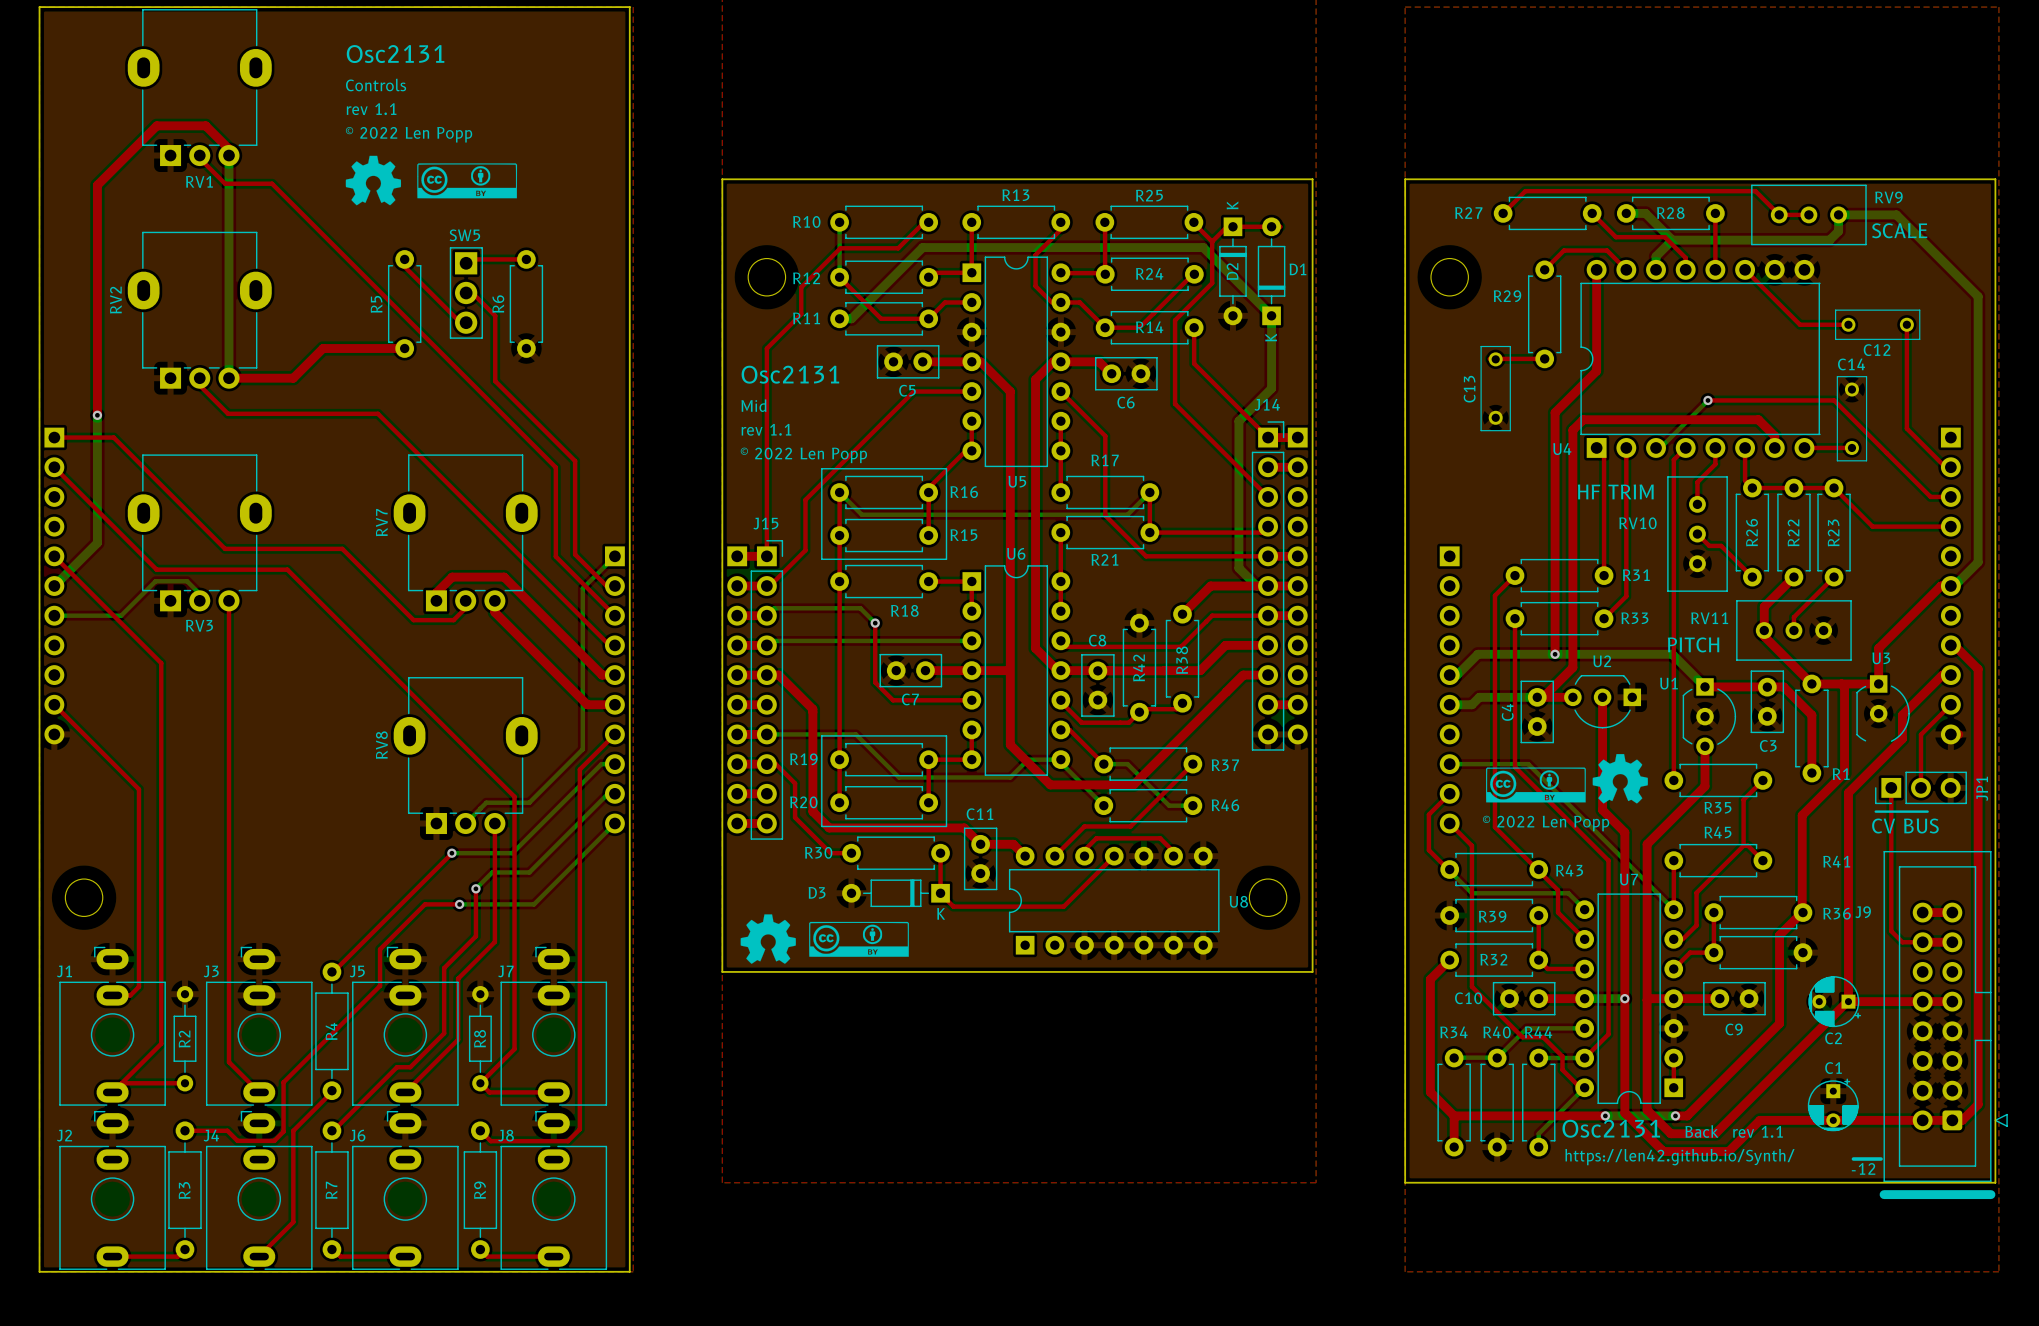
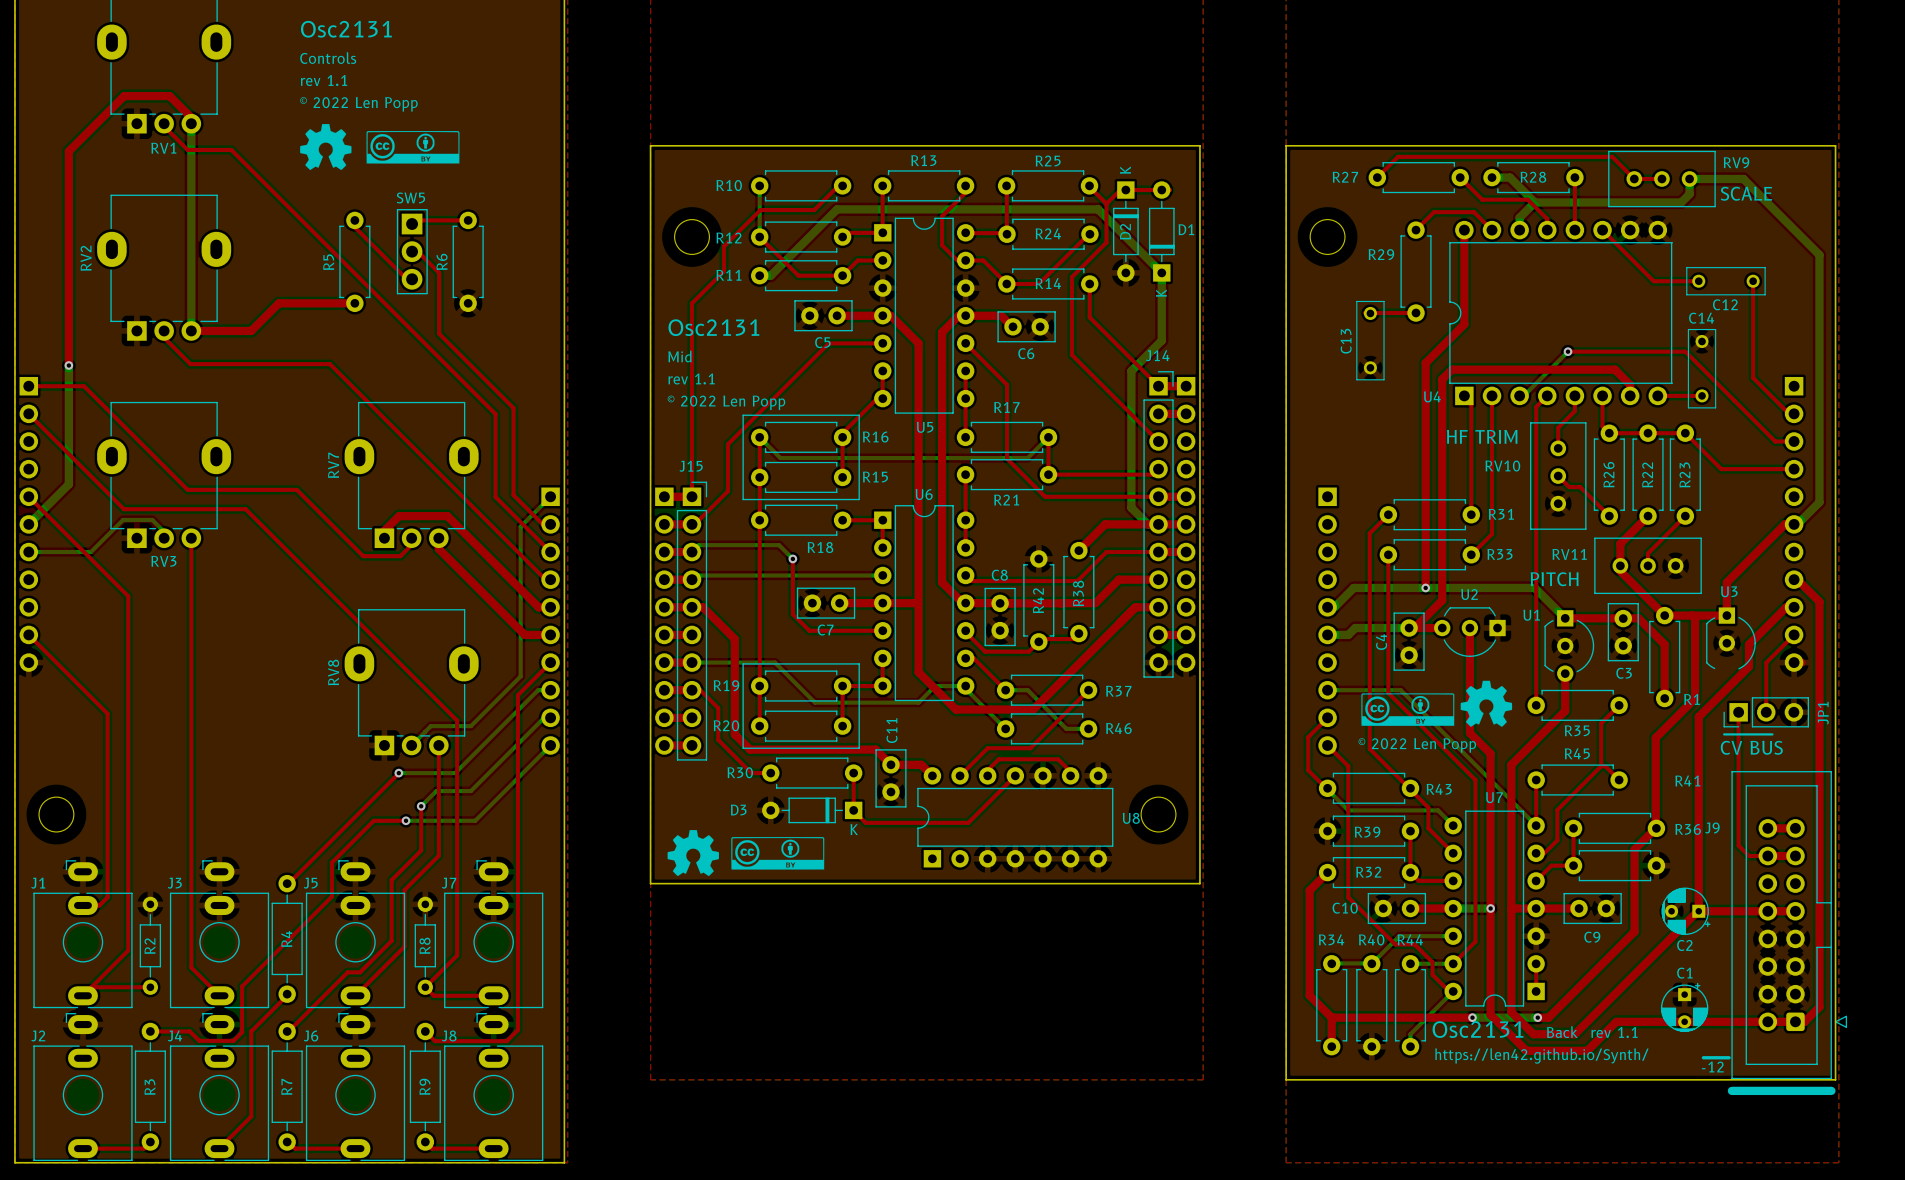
C11 name rotation: 0° (980, 814) -> 90° counterclockwise (892, 730)

